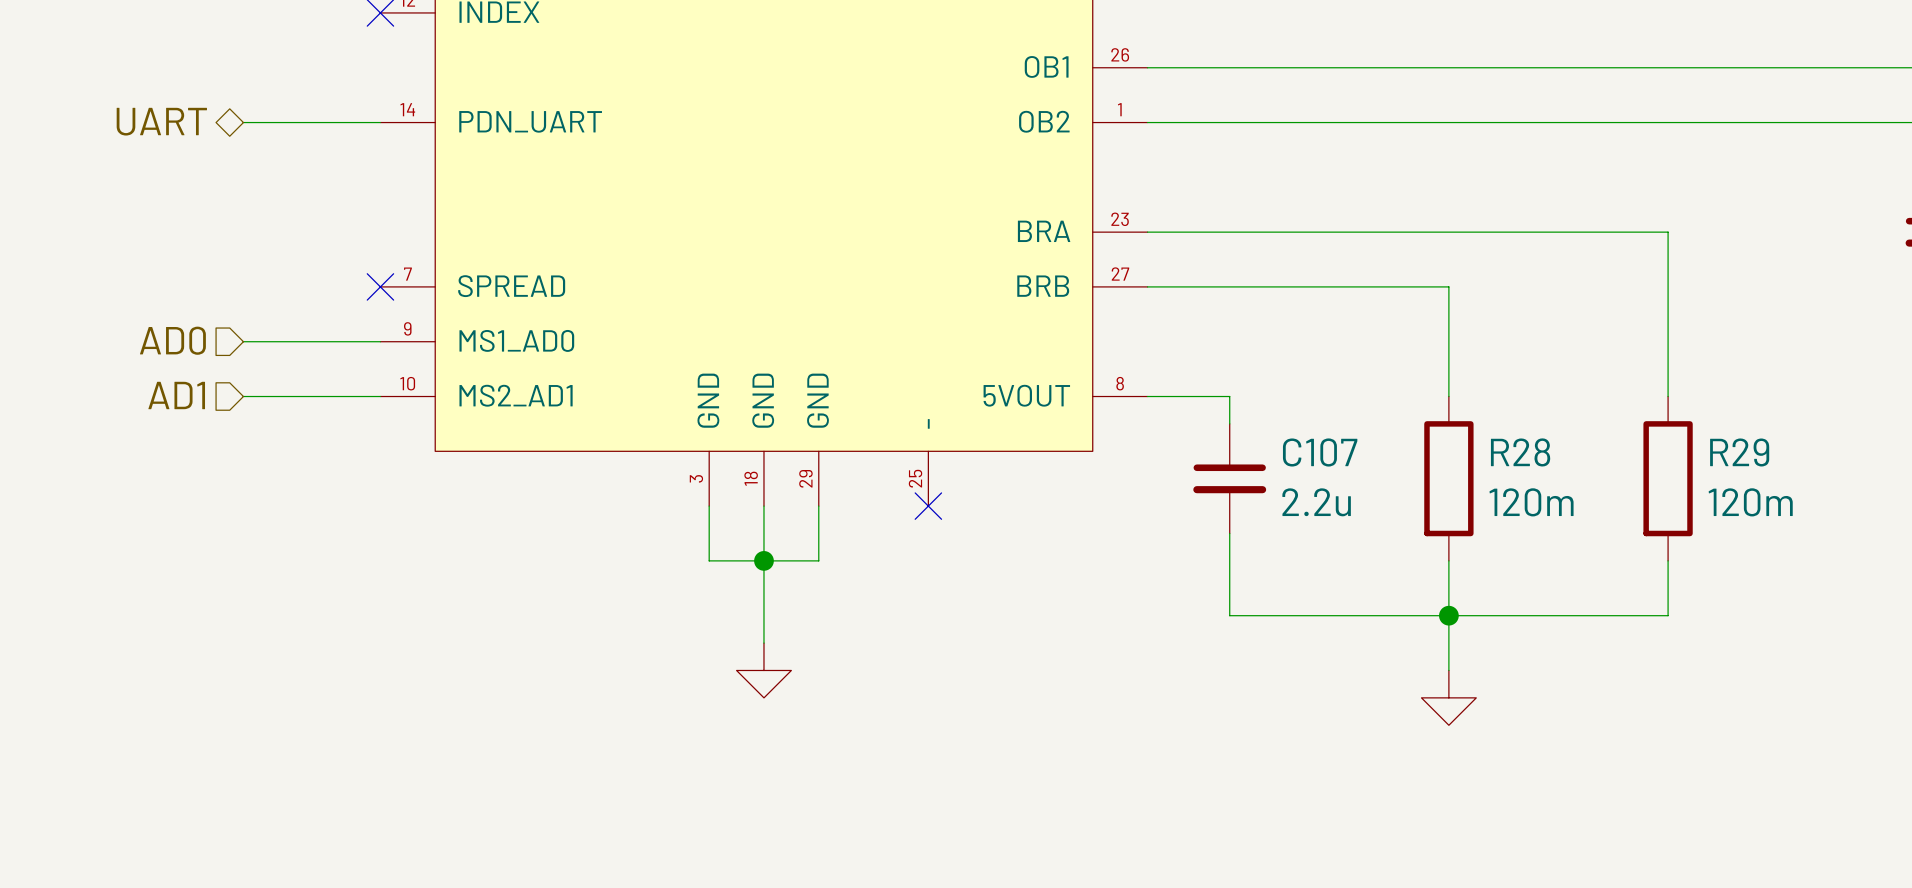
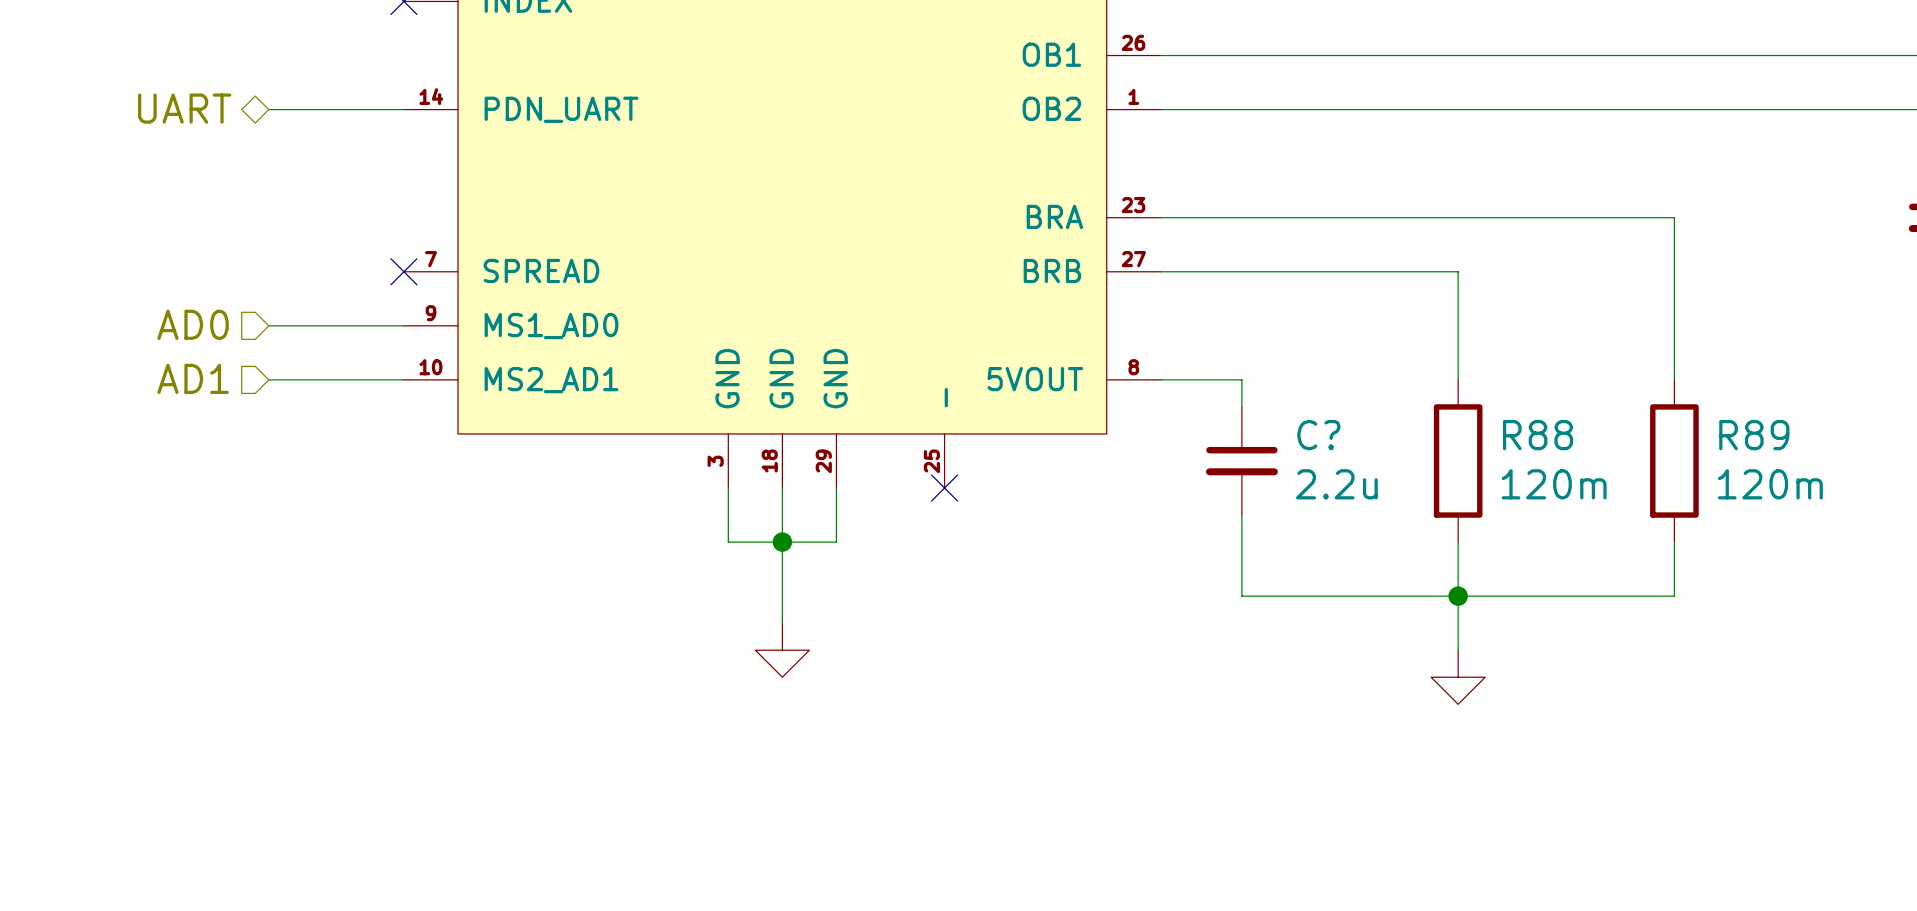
C107 name: C107 (1320, 452) -> C? (1318, 435)
R28 name: R28 (1520, 452) -> R88 (1538, 435)
R29 name: R29 (1739, 452) -> R89 (1754, 435)

